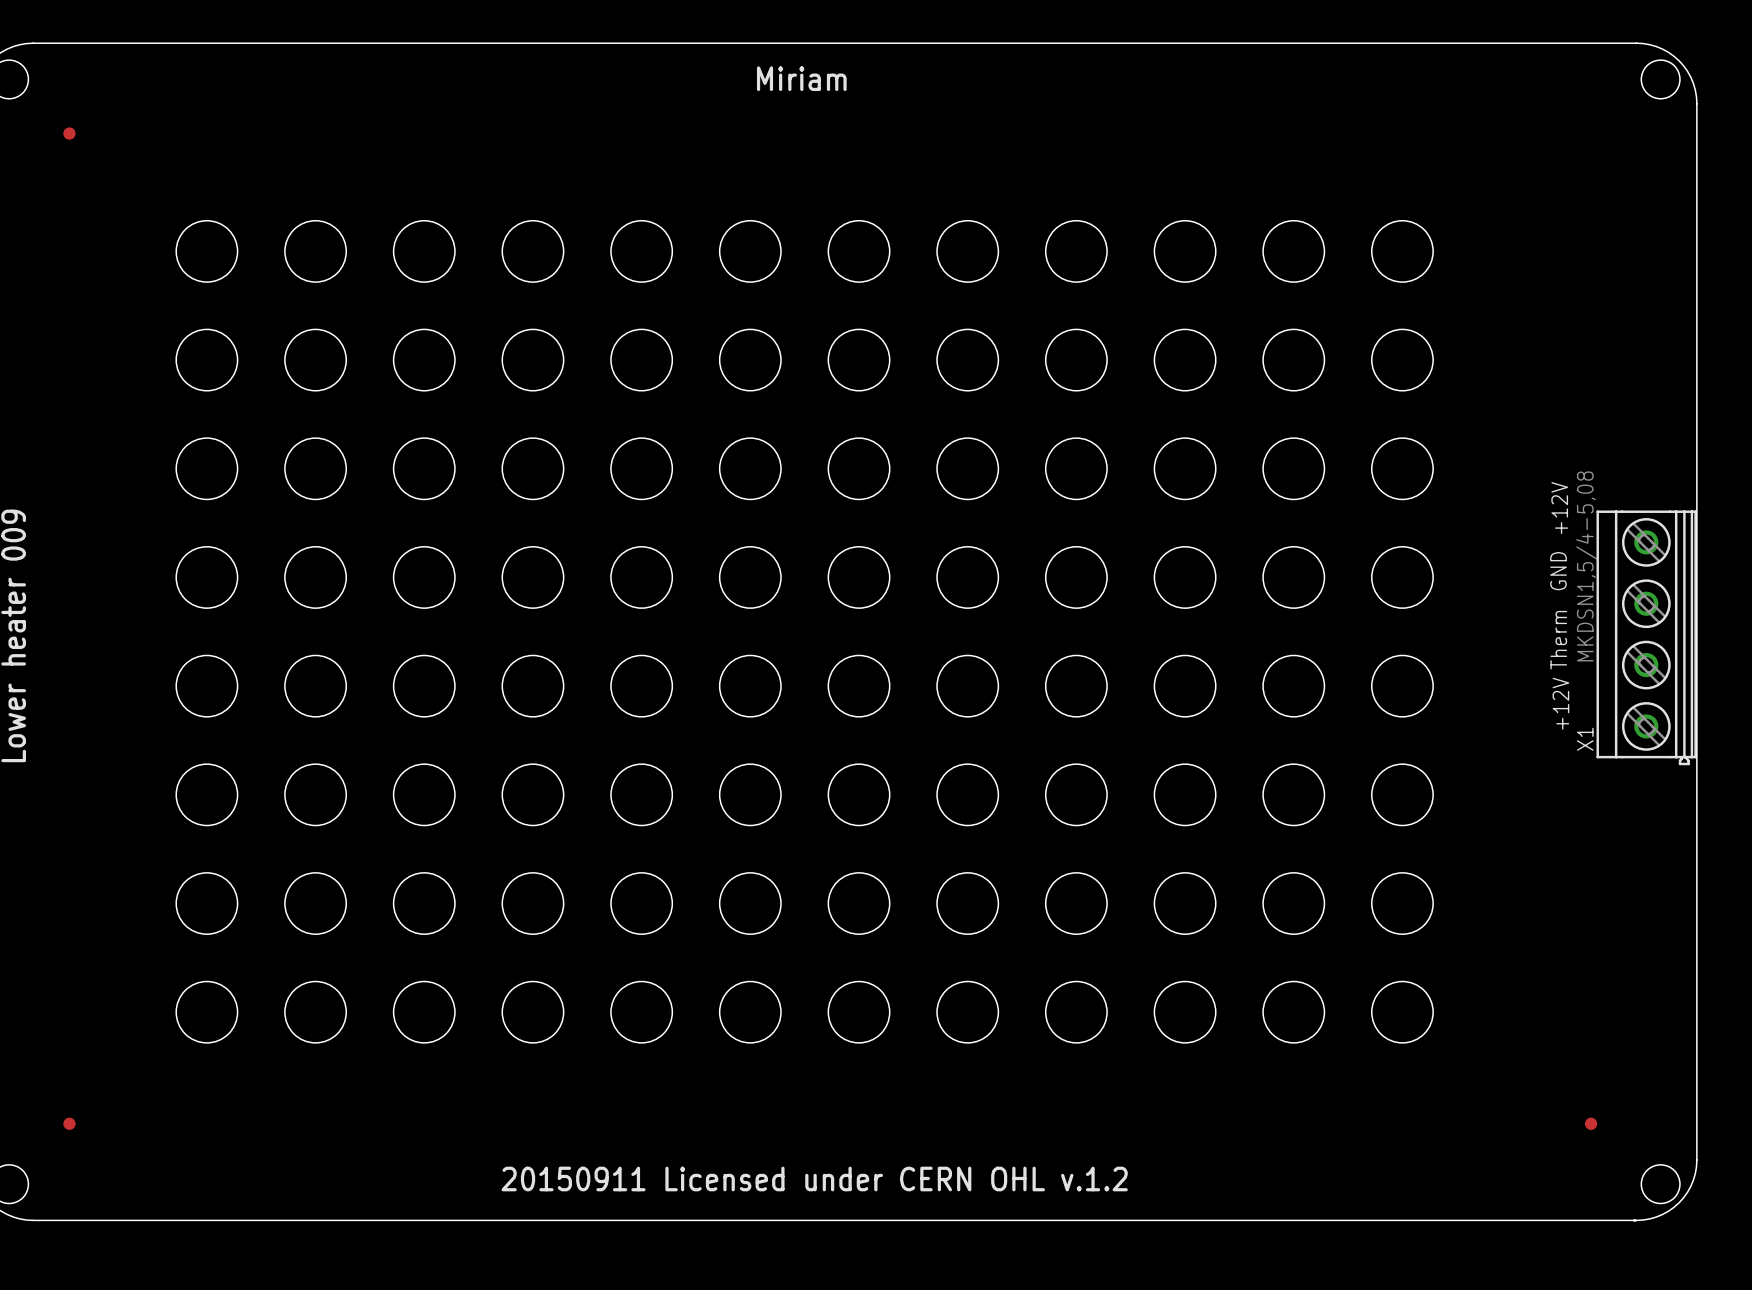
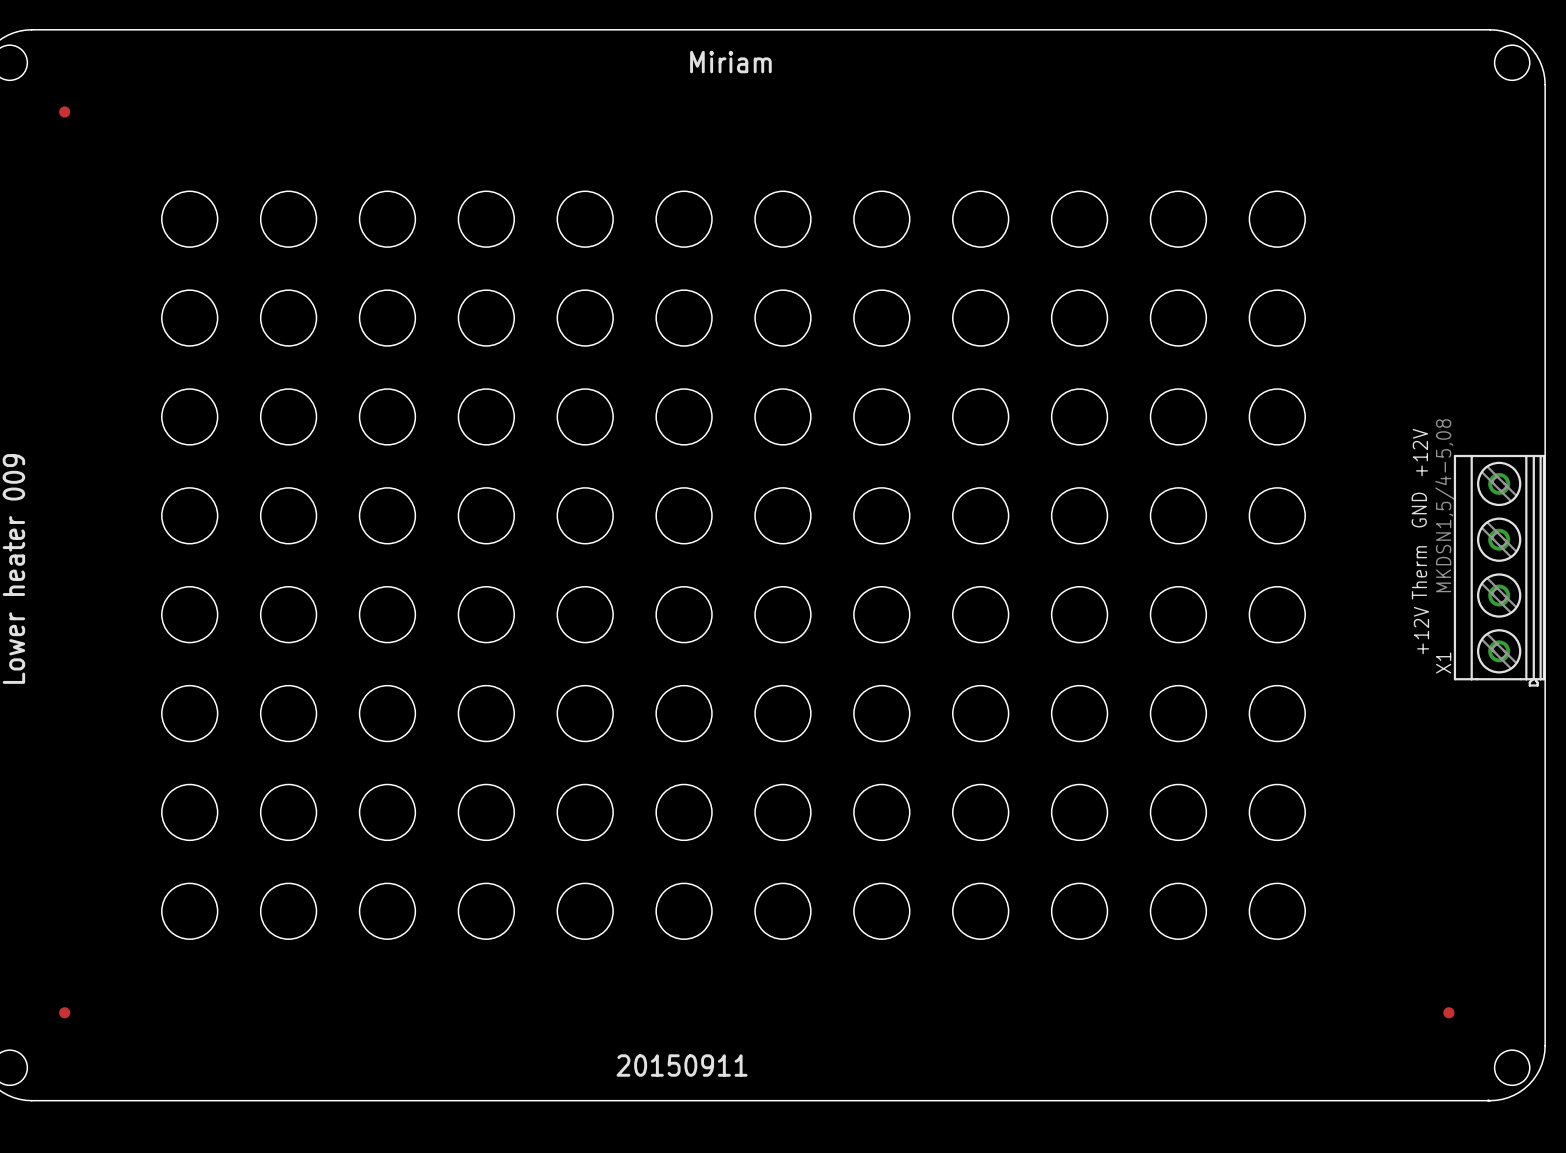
text: 20150911 Licensed under CERN OHL v.1.2 (814, 1179) -> none
text: none -> 20150911 (682, 1065)

